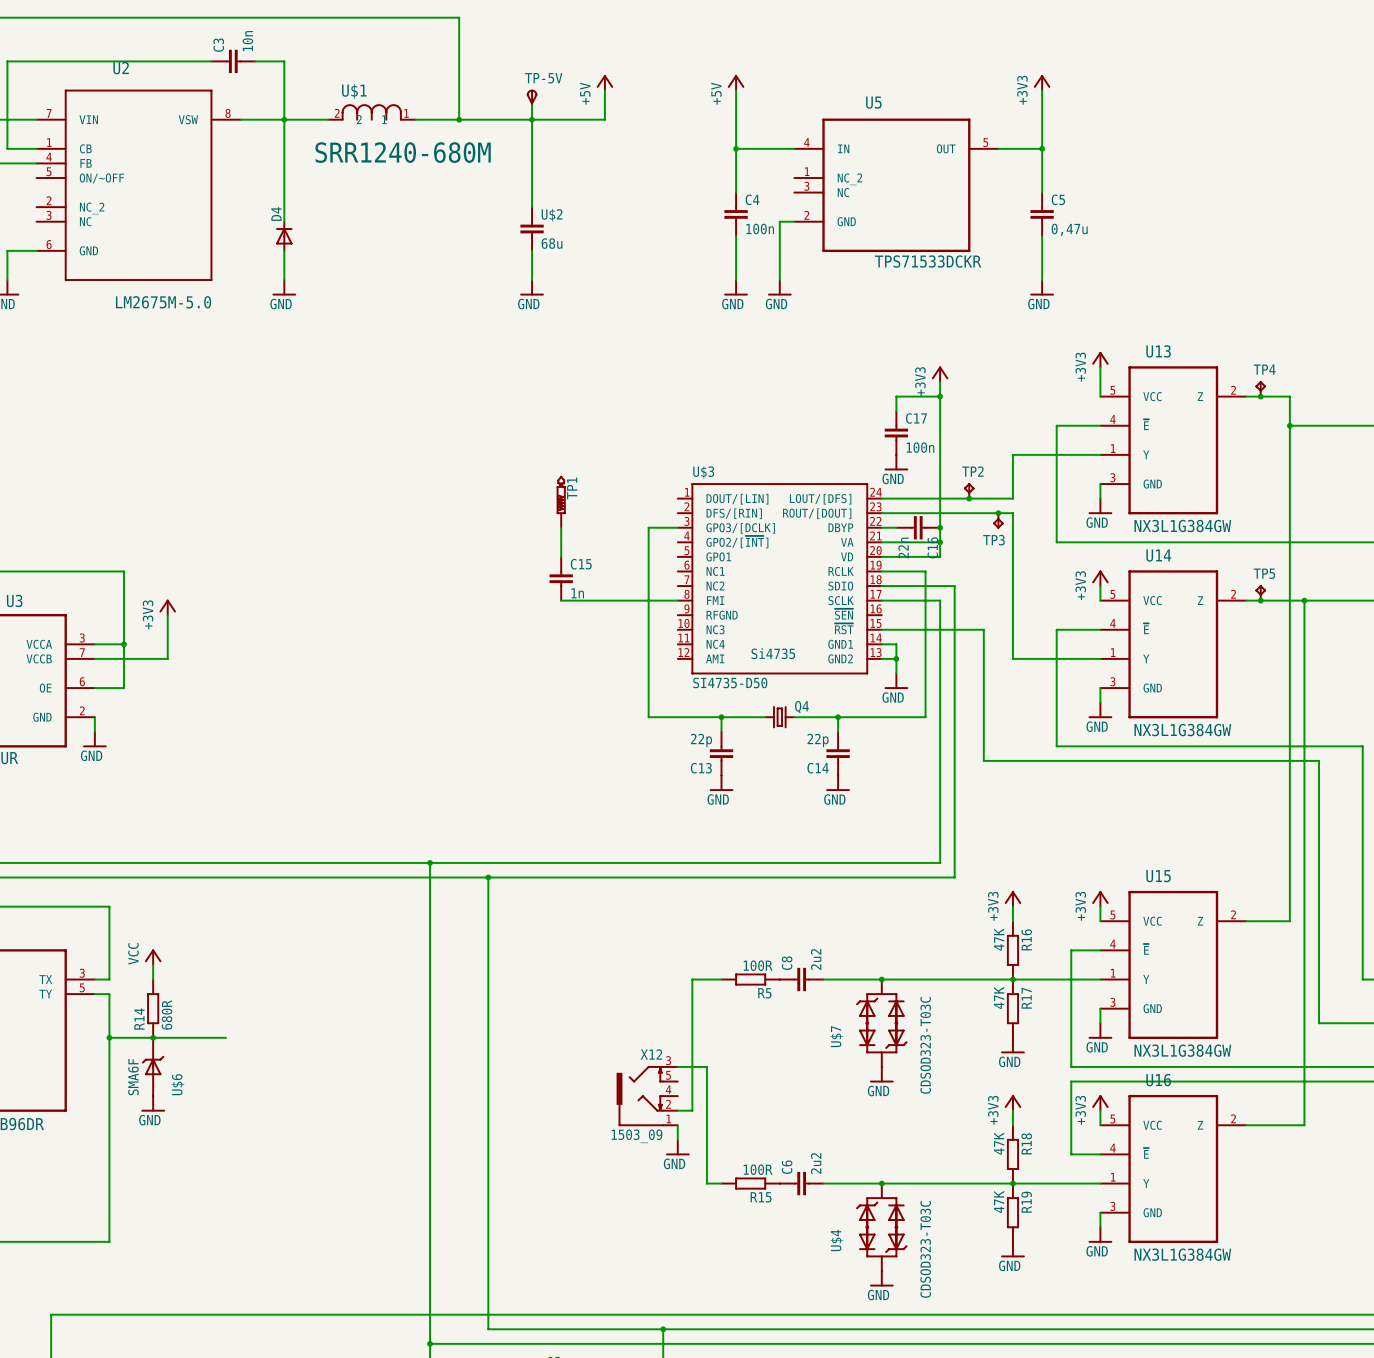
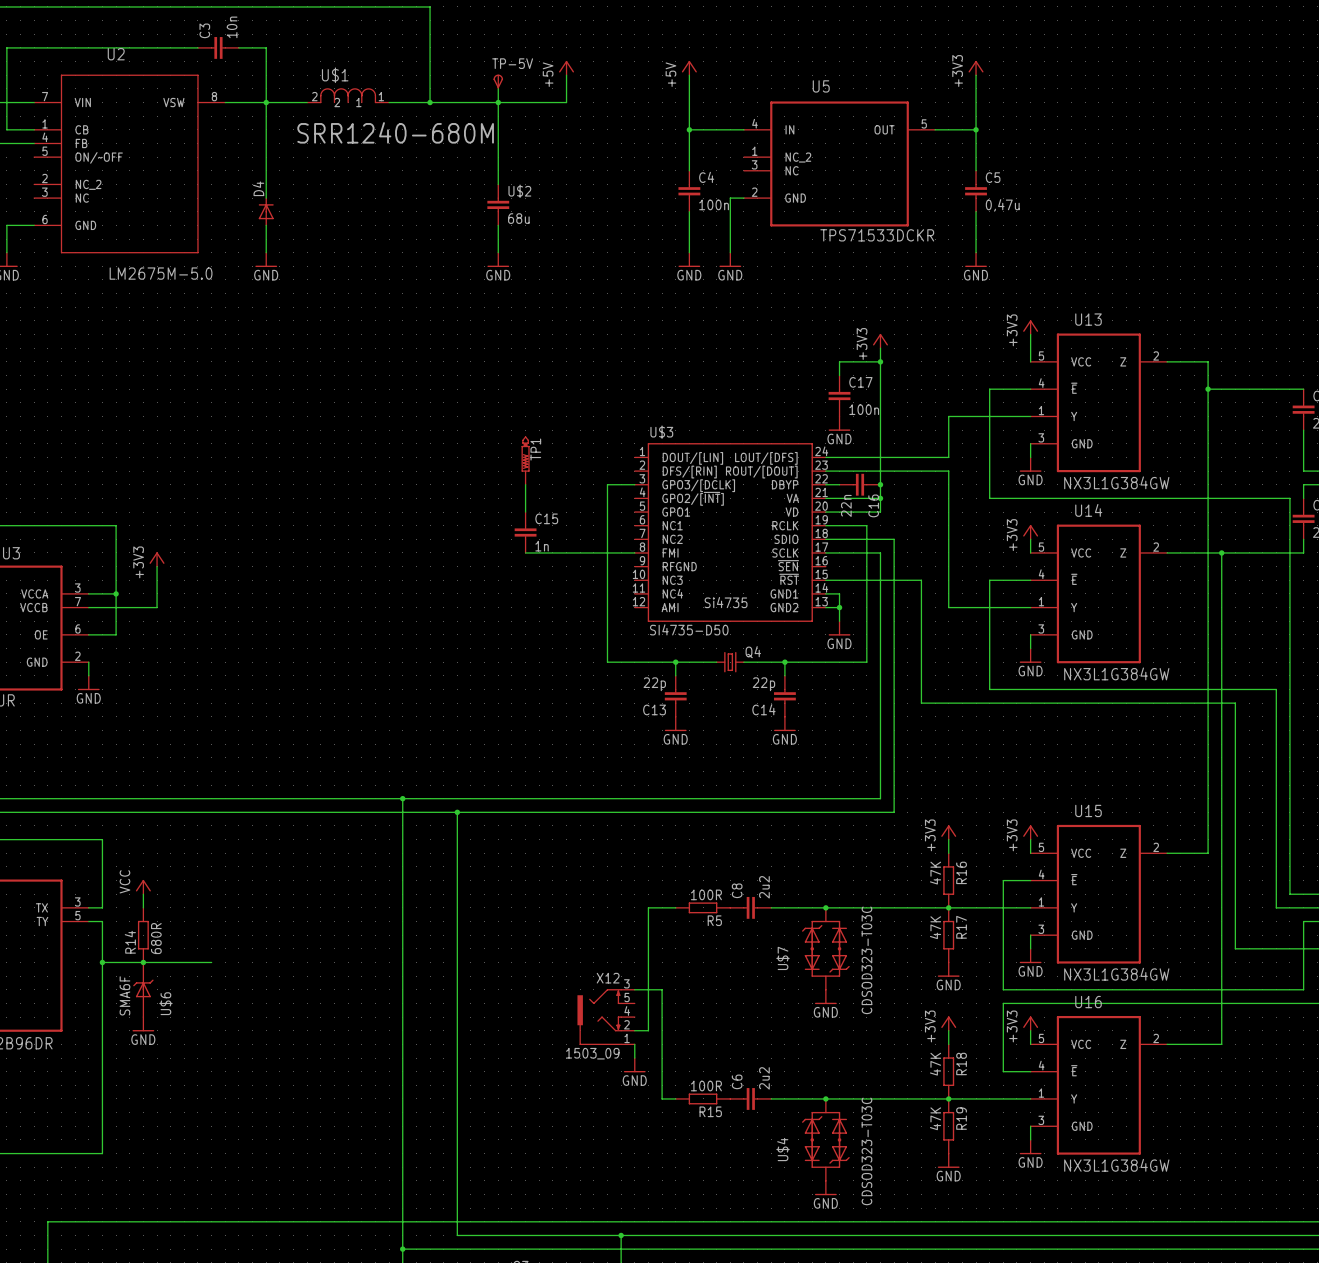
TP4: (1260, 388) -> none
junction: (1260, 396) -> none
TP2: (969, 490) -> none
junction: (969, 498) -> none
junction: (998, 513) -> none
TP3: (998, 520) -> none
TP5: (1260, 592) -> none
junction: (1260, 600) -> none

